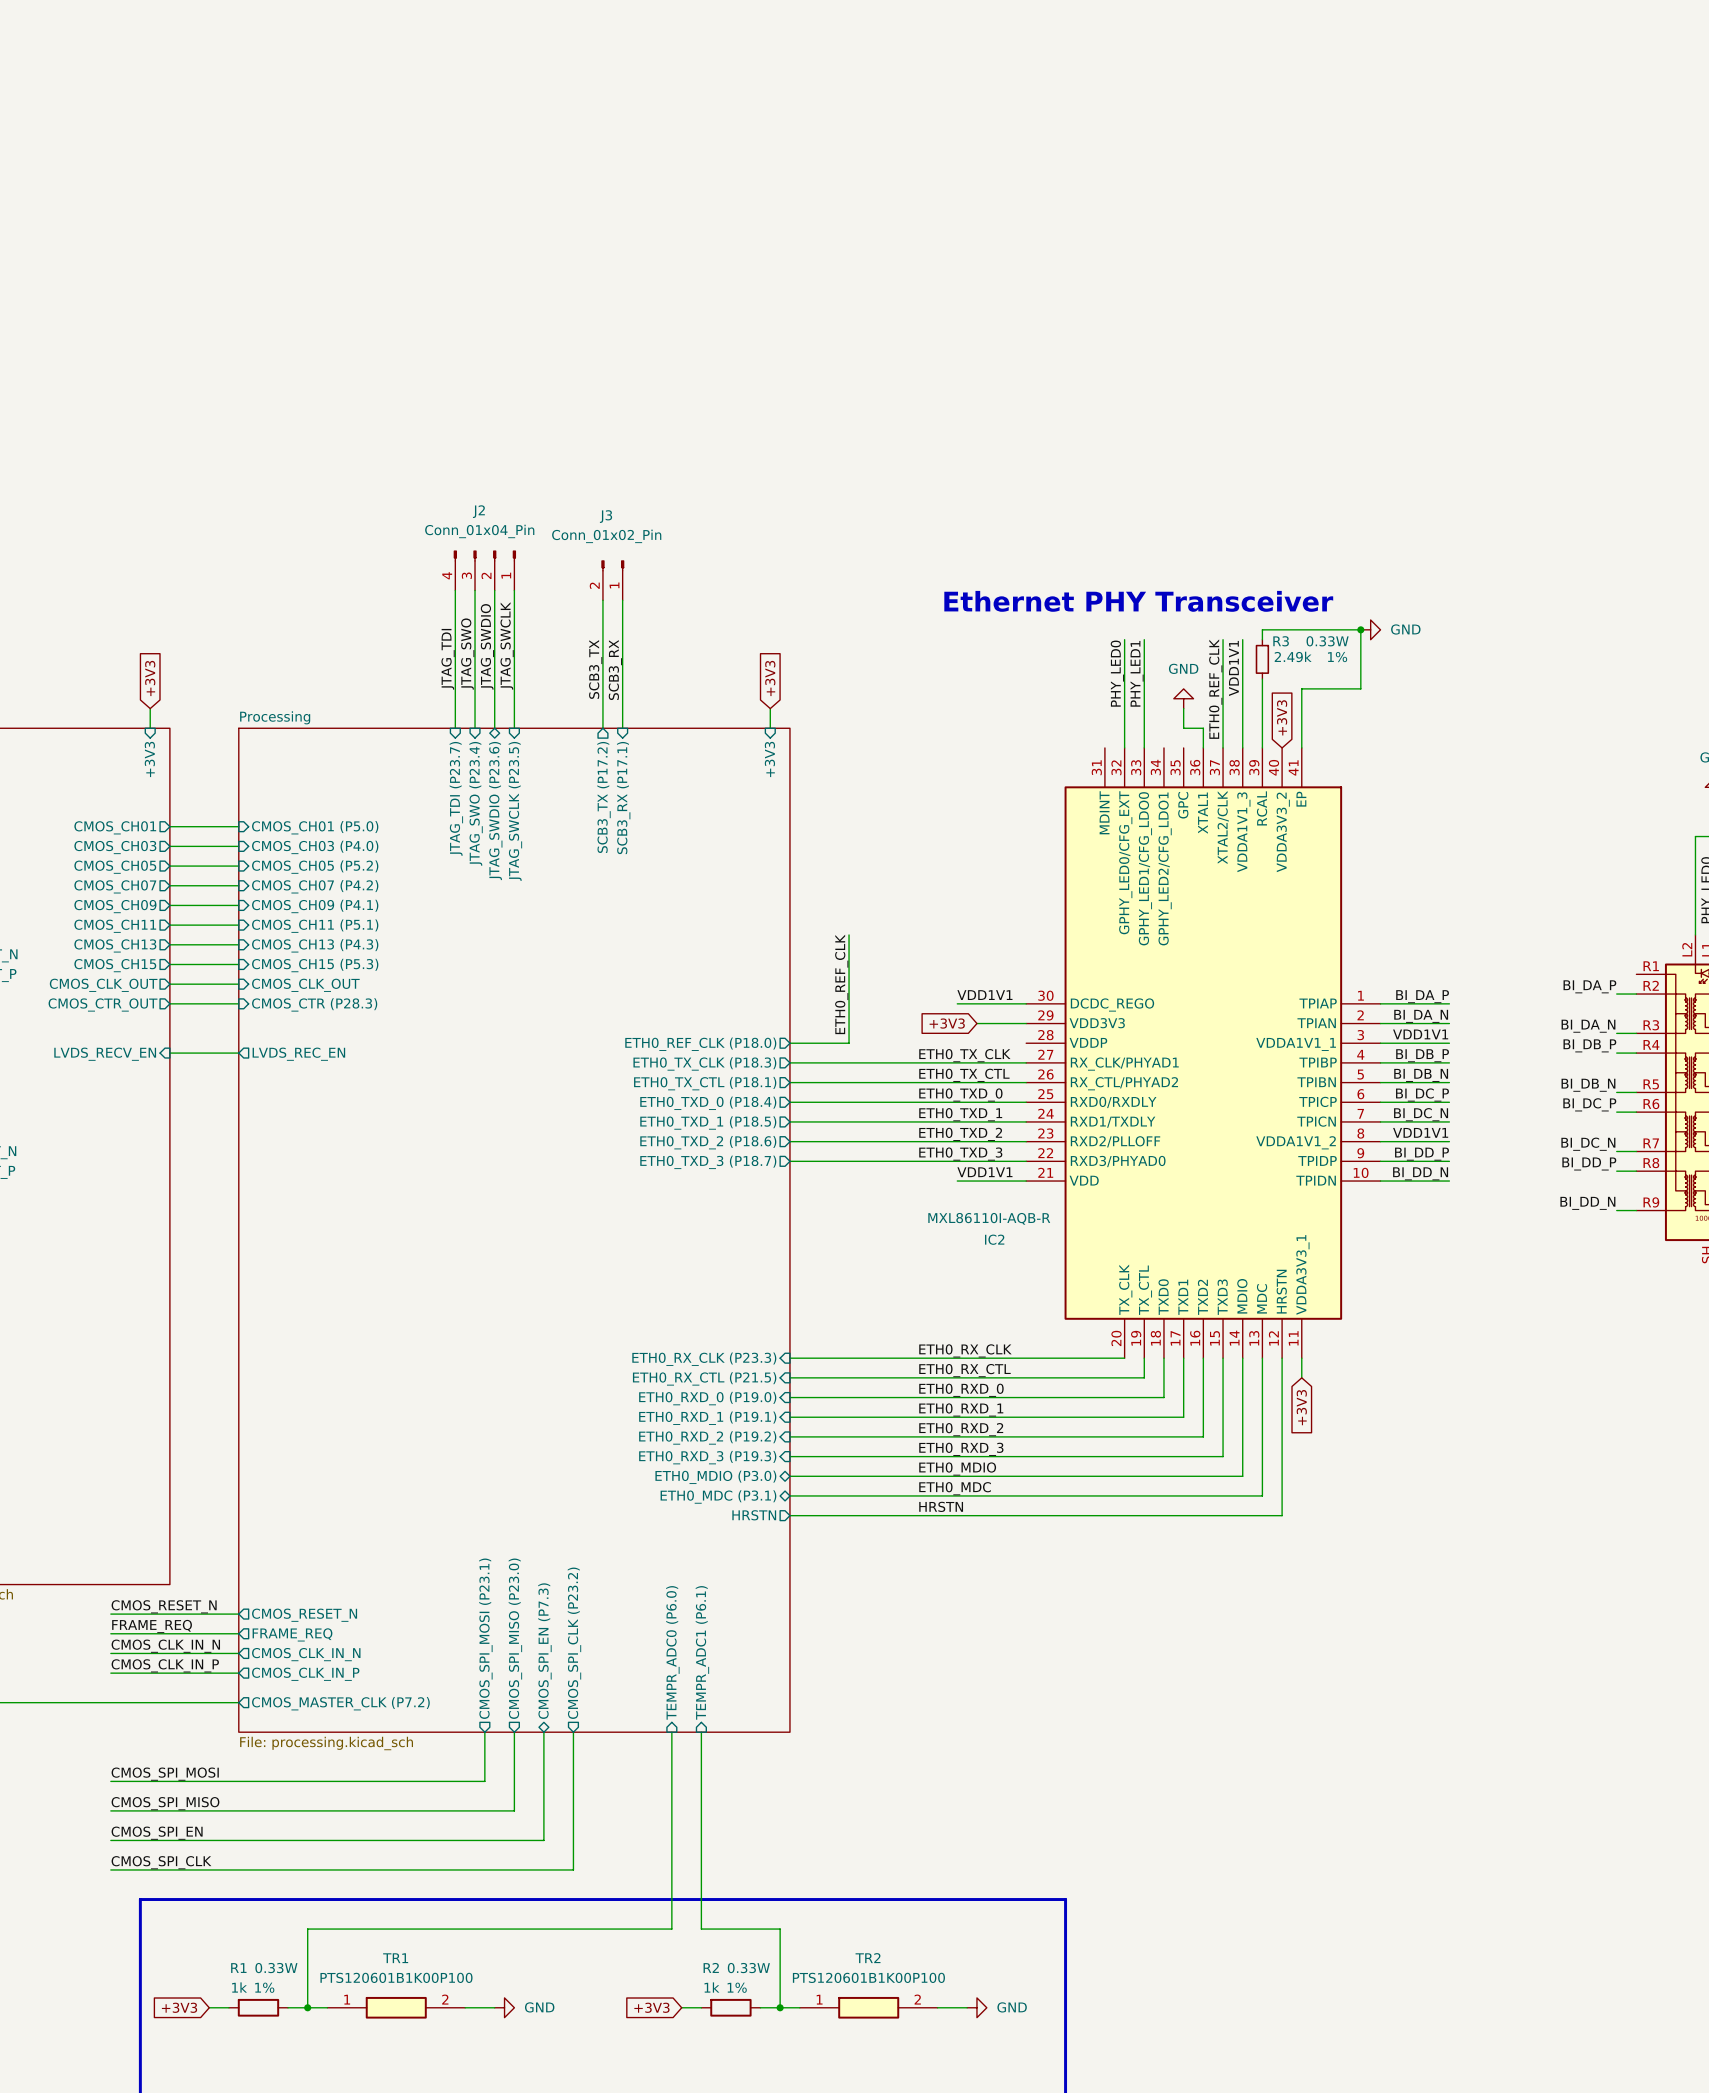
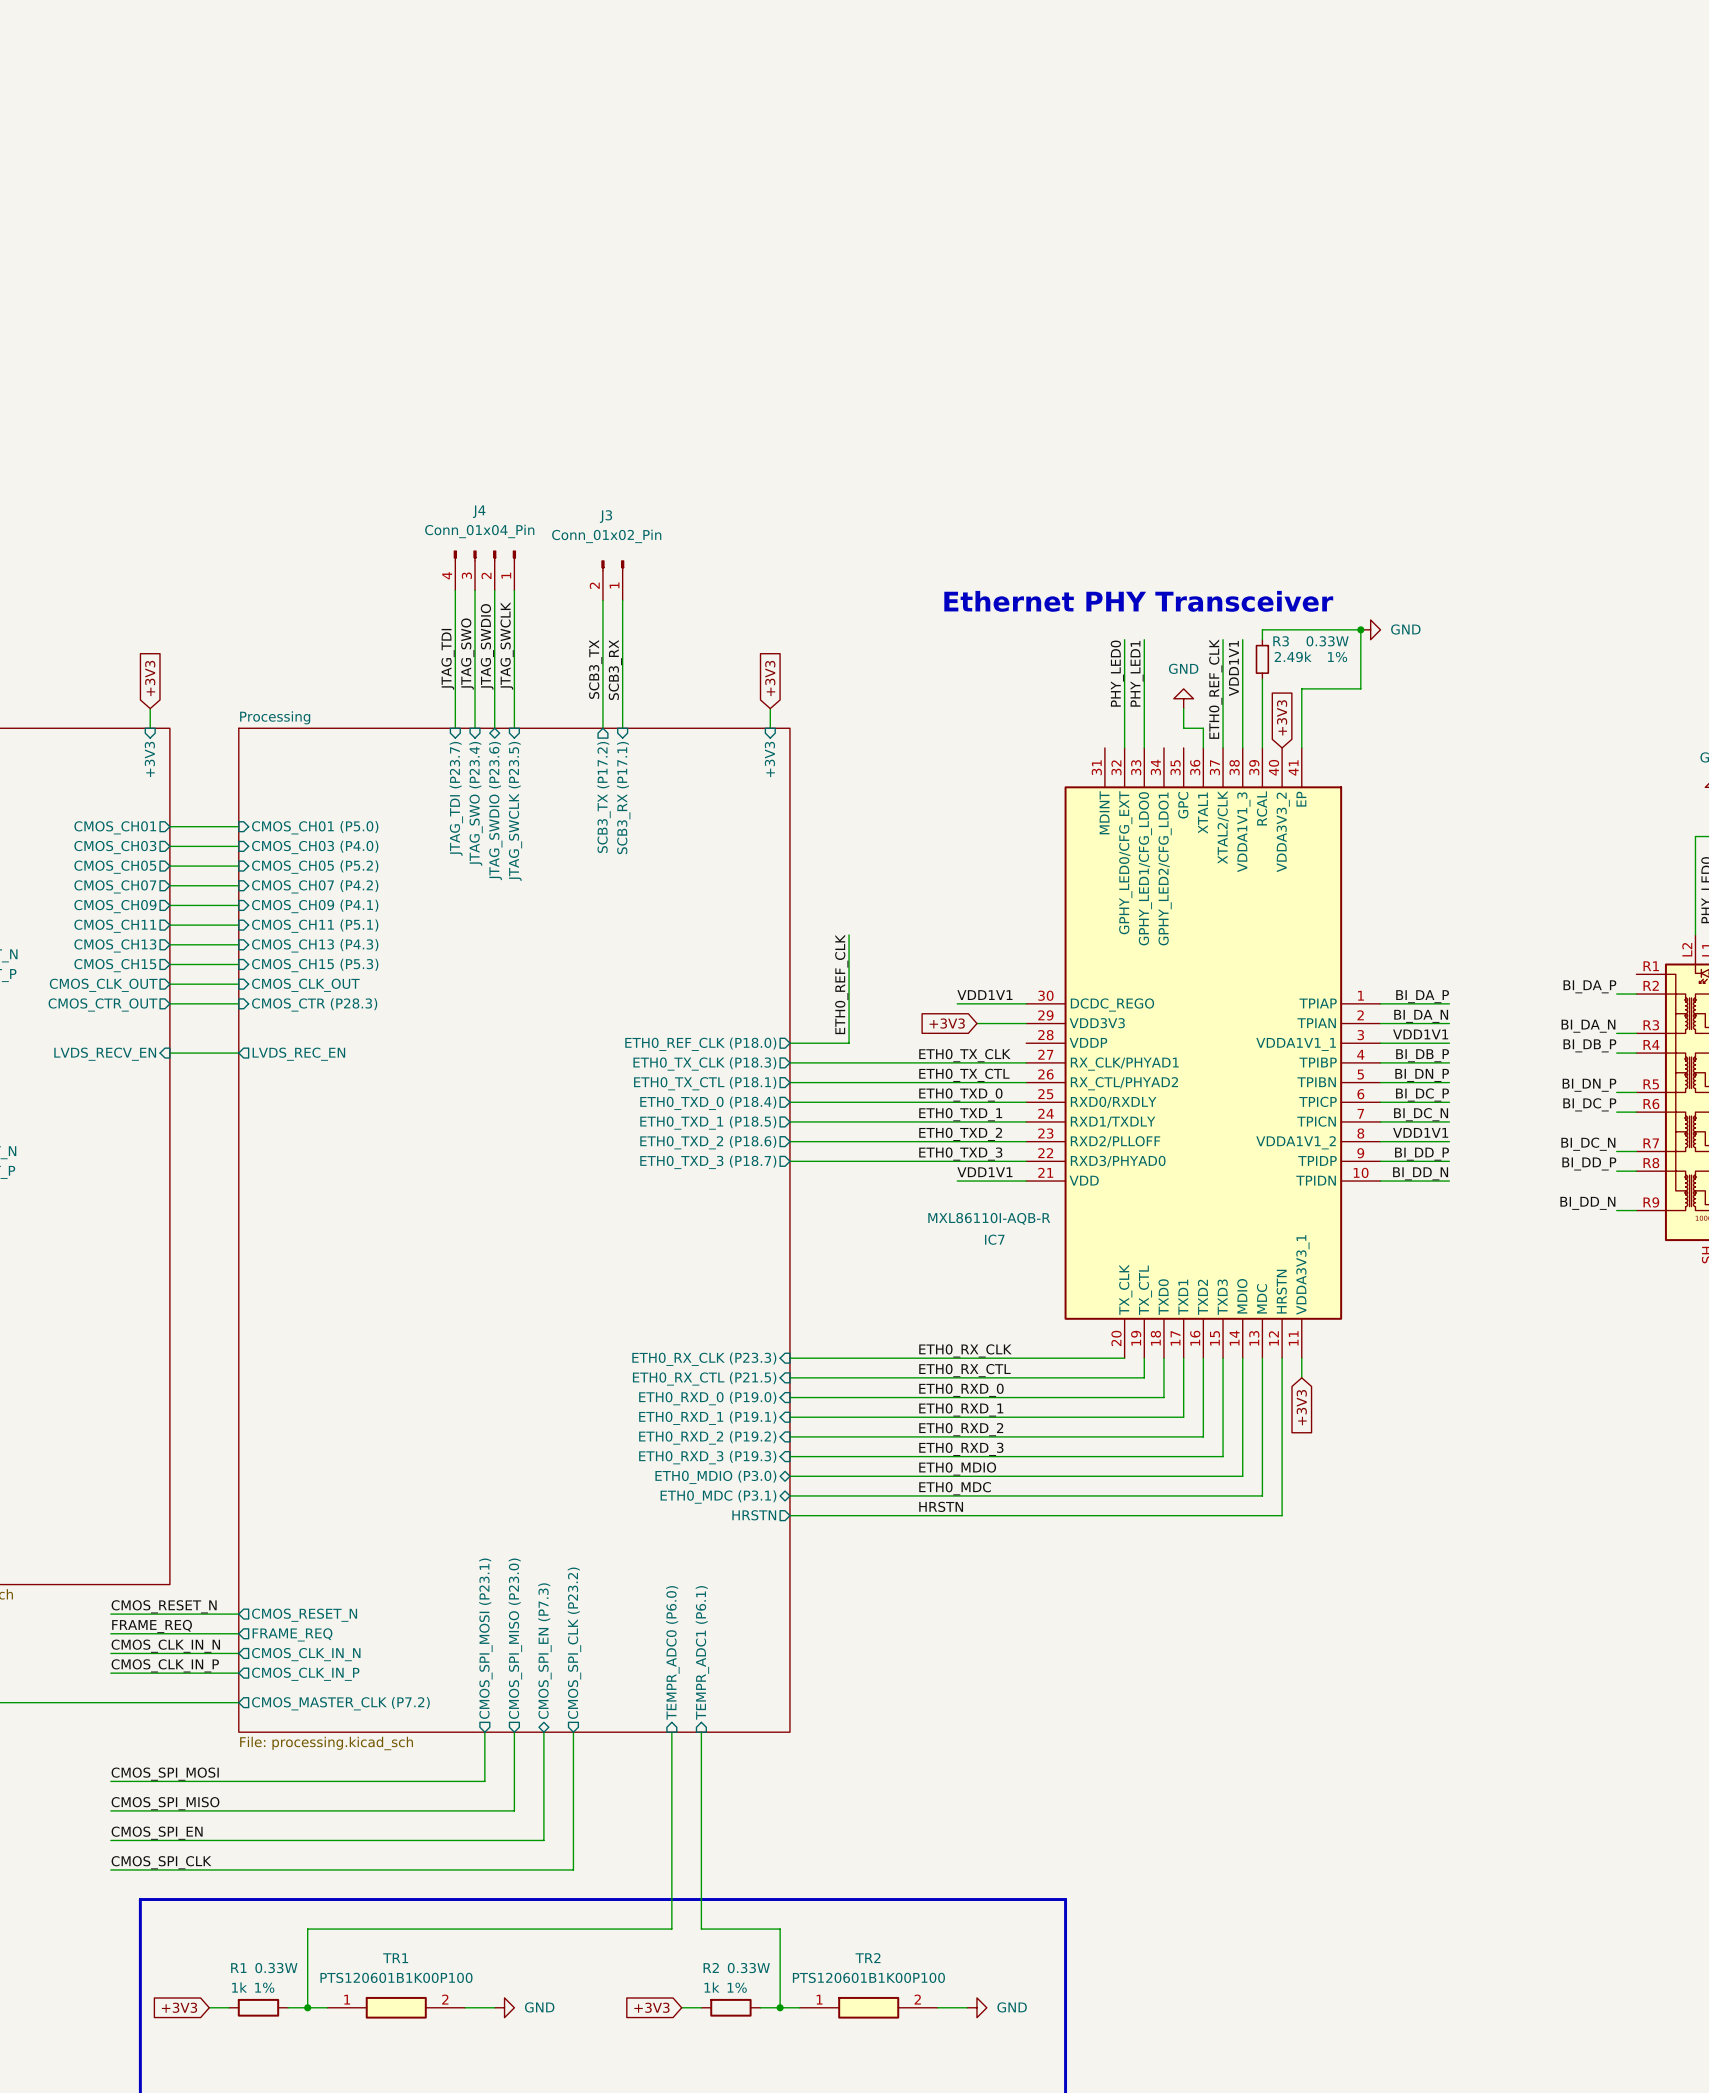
J2 name: J2 (478, 511) -> J4 (479, 511)
label: BI_DB_N (1421, 1075) -> BI_DN_P (1422, 1075)
label: BI_DB_N (1588, 1085) -> BI_DN_P (1589, 1085)
IC2 name: IC2 (994, 1239) -> IC7 (994, 1239)

